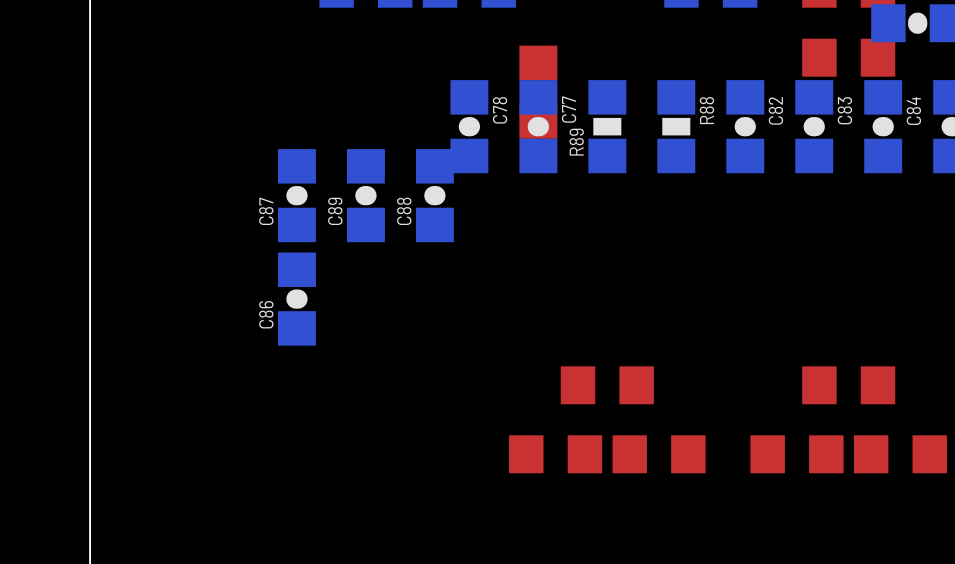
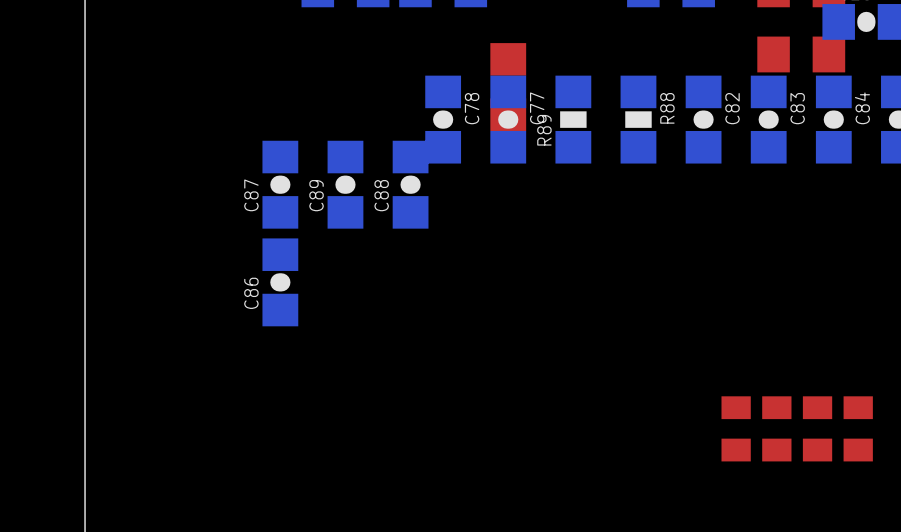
part: (607, 385) -> none
part: (848, 385) -> none
part footprint: [853, 435, 948, 474] -> [843, 396, 873, 462]
part: (555, 454) -> none
part: (659, 454) -> none
part: none -> (736, 428)
part: (796, 454) -> none
part: none -> (776, 428)
part: none -> (817, 428)

